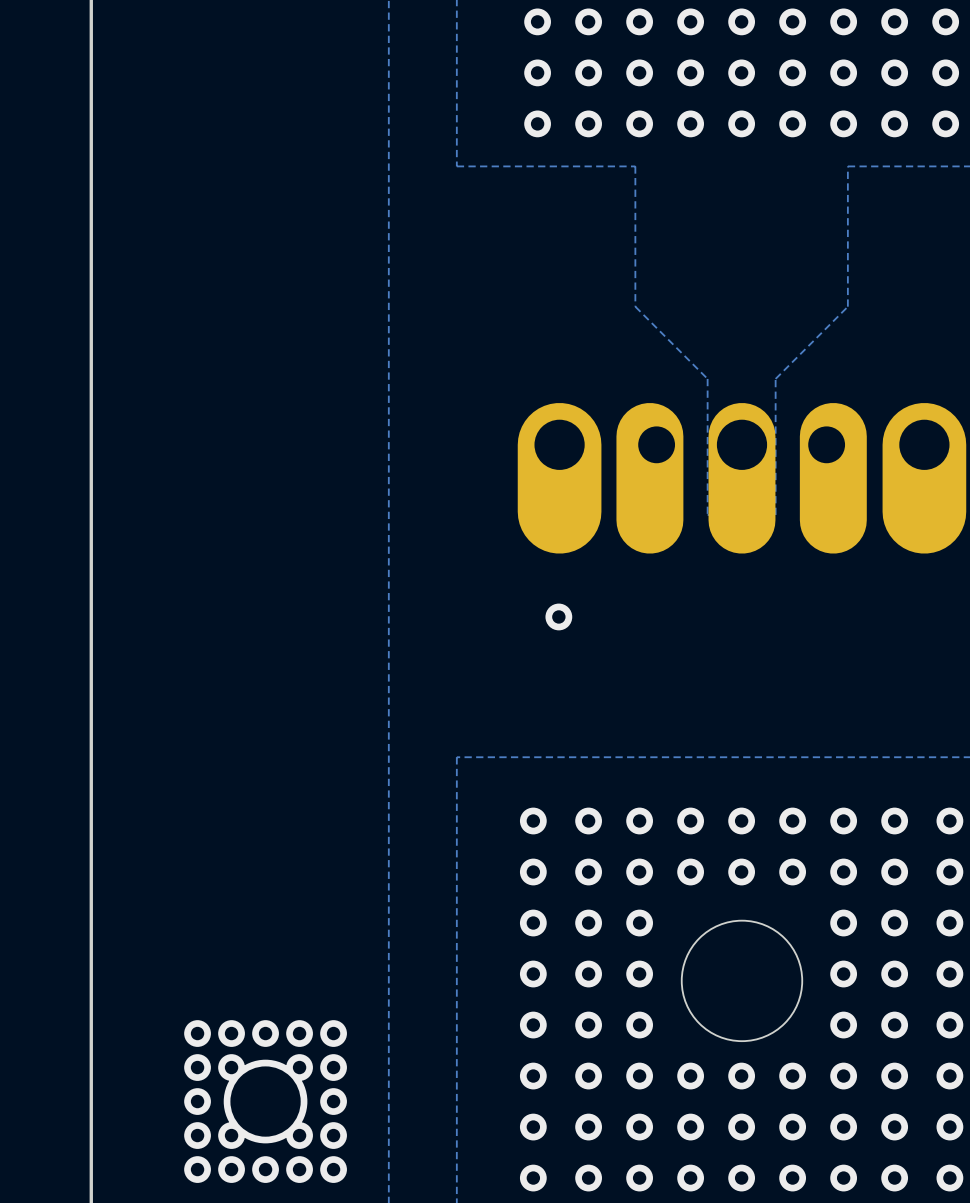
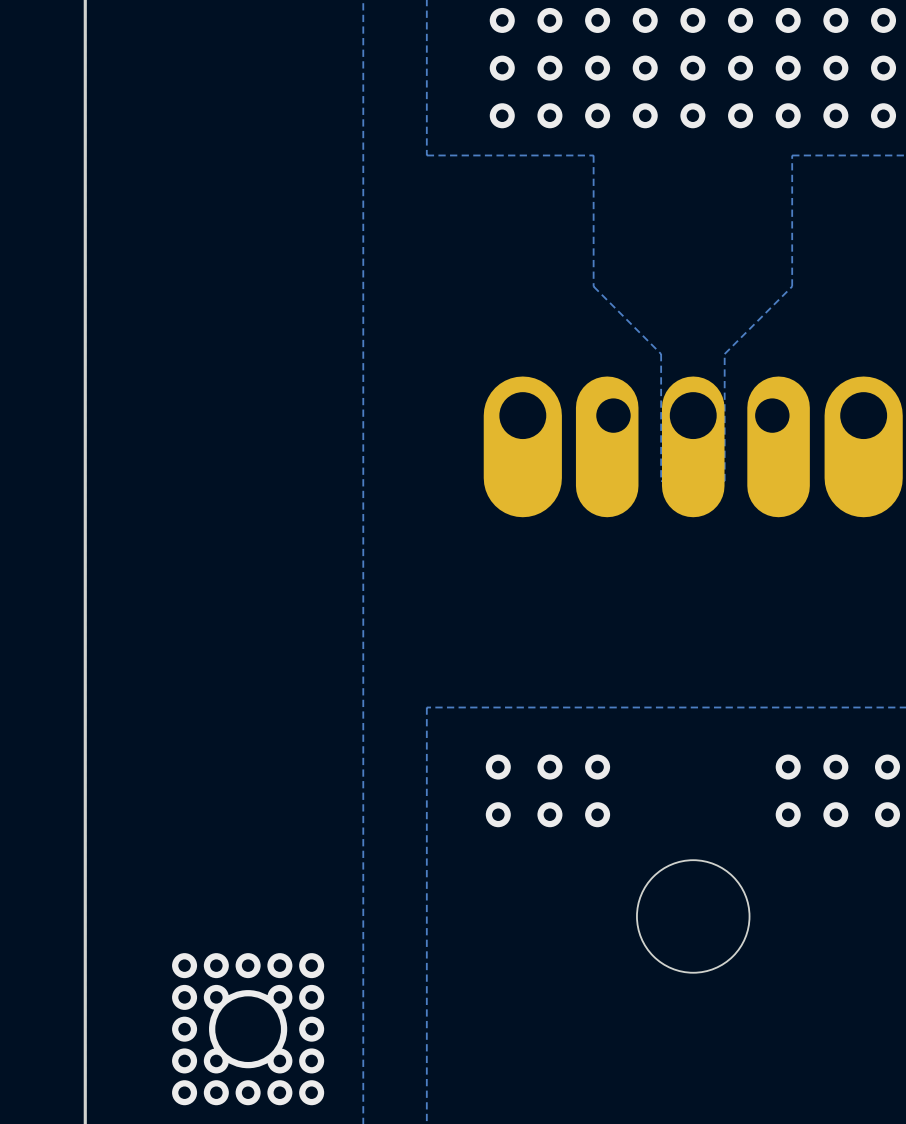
via: (558, 616) -> none
via: (690, 821) -> none
via: (741, 821) -> none
via: (792, 821) -> none
via: (690, 872) -> none
via: (741, 872) -> none
via: (792, 872) -> none
via: (533, 923) -> none
via: (588, 923) -> none
via: (639, 923) -> none
via: (843, 923) -> none
via: (894, 923) -> none
via: (949, 923) -> none
via: (533, 974) -> none
via: (588, 974) -> none
via: (639, 974) -> none
via: (843, 974) -> none
via: (894, 974) -> none
via: (949, 974) -> none
via: (533, 1025) -> none
via: (588, 1025) -> none
via: (639, 1025) -> none
via: (843, 1025) -> none
via: (894, 1025) -> none
via: (949, 1025) -> none
via: (533, 1076) -> none
via: (588, 1076) -> none
via: (639, 1076) -> none
via: (690, 1076) -> none
via: (741, 1076) -> none
via: (792, 1076) -> none
via: (843, 1076) -> none
via: (894, 1076) -> none
via: (949, 1076) -> none
via: (533, 1127) -> none
via: (588, 1127) -> none
via: (639, 1127) -> none
via: (690, 1127) -> none
via: (741, 1127) -> none
via: (792, 1127) -> none
via: (843, 1127) -> none
via: (894, 1127) -> none
via: (949, 1127) -> none
via: (533, 1178) -> none
via: (588, 1178) -> none
via: (639, 1178) -> none
via: (690, 1178) -> none
via: (741, 1178) -> none
via: (792, 1178) -> none
via: (843, 1178) -> none
via: (894, 1178) -> none
via: (949, 1178) -> none

